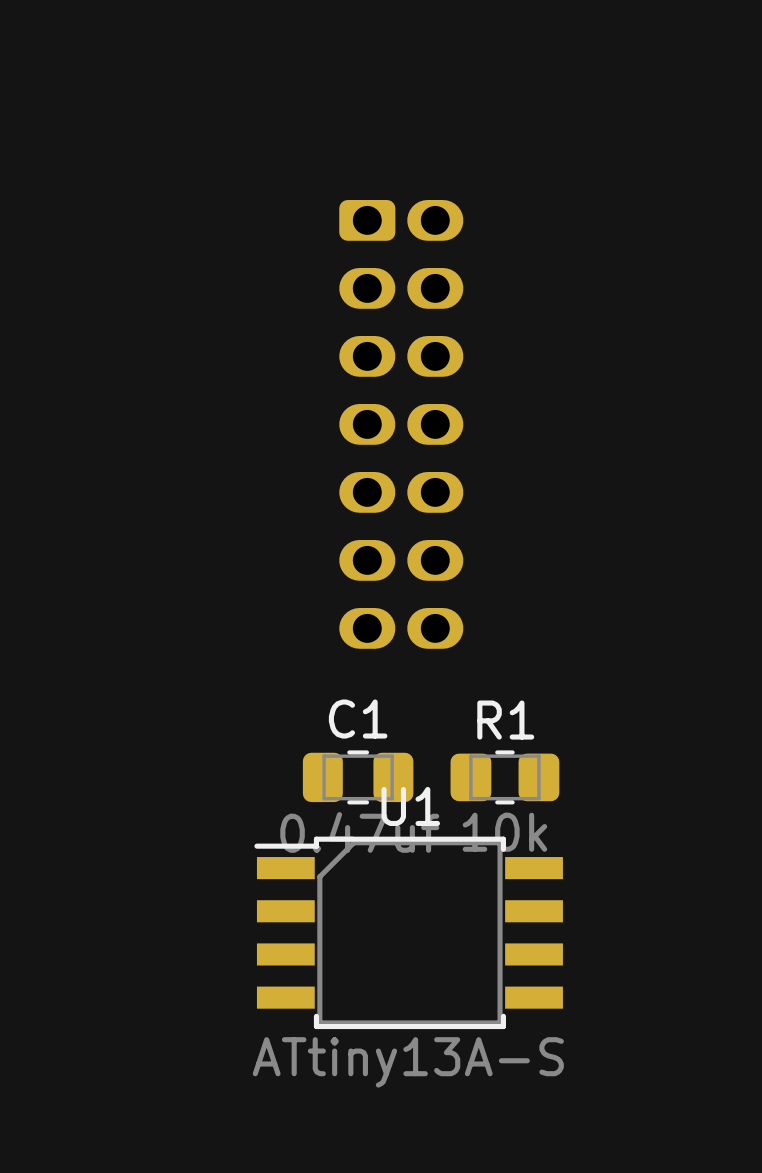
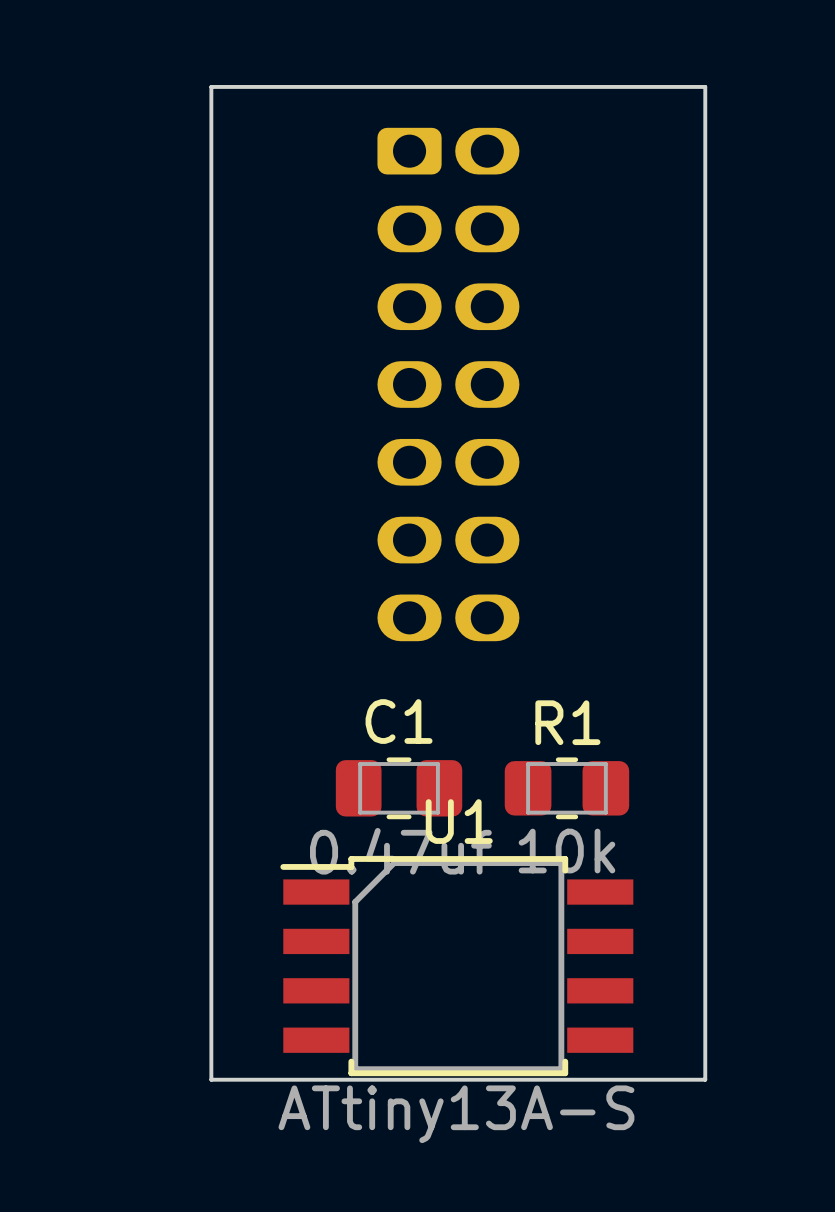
board edge: none -> (211, 86) (705, 86) (705, 1079) (211, 1079) (211, 86)

